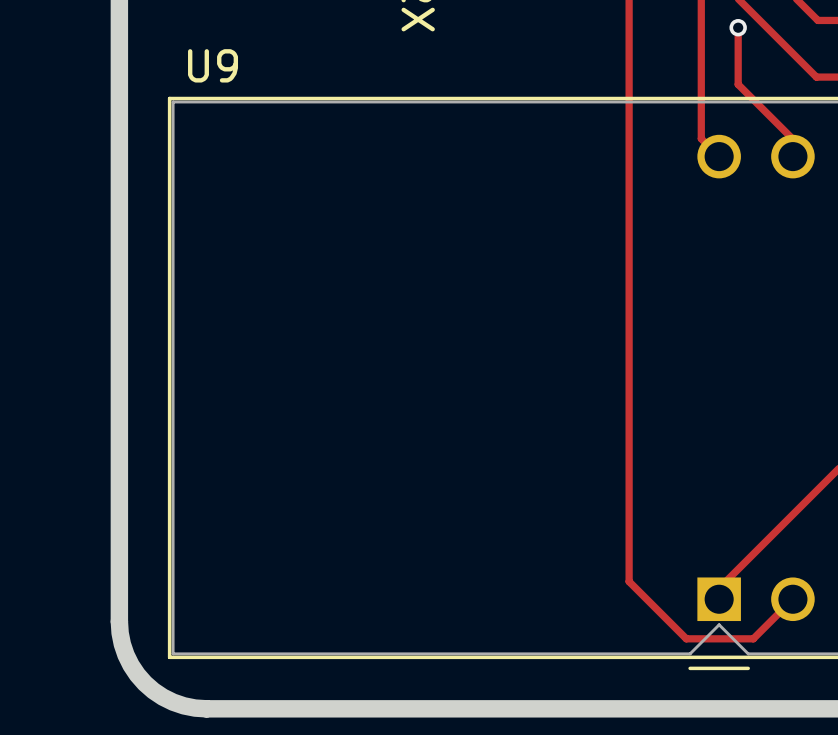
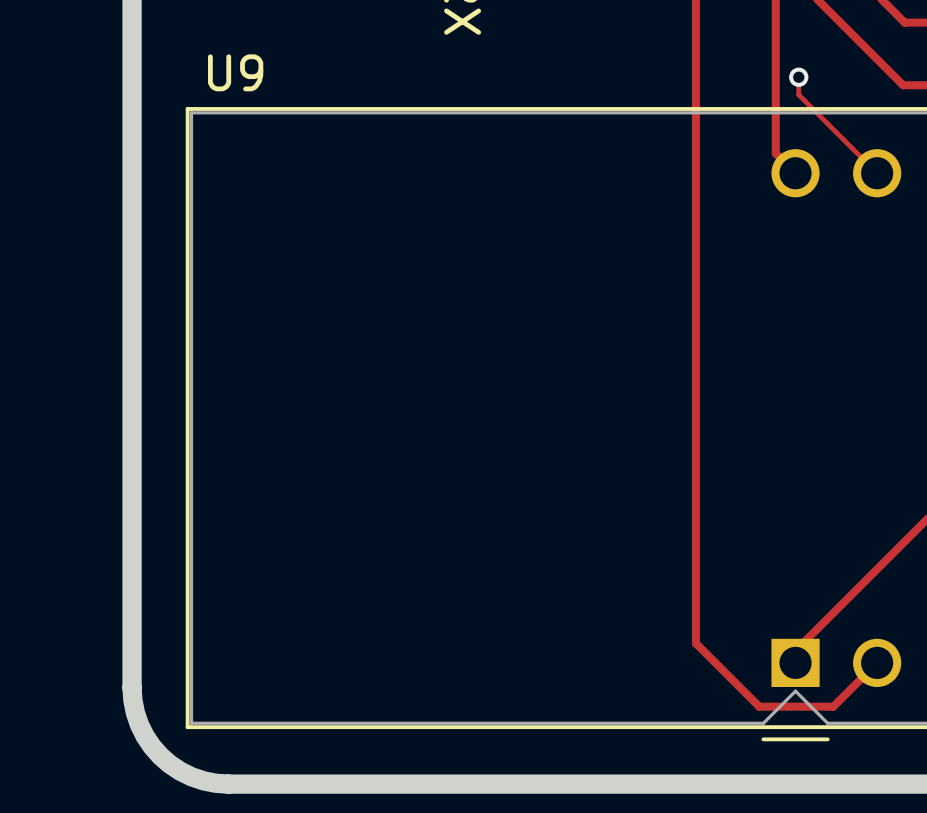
track: (738, 27) (738, 84) (792, 139) (792, 156) -> (798, 77) (798, 94) (877, 173)
via position: (738, 27) -> (798, 77)

